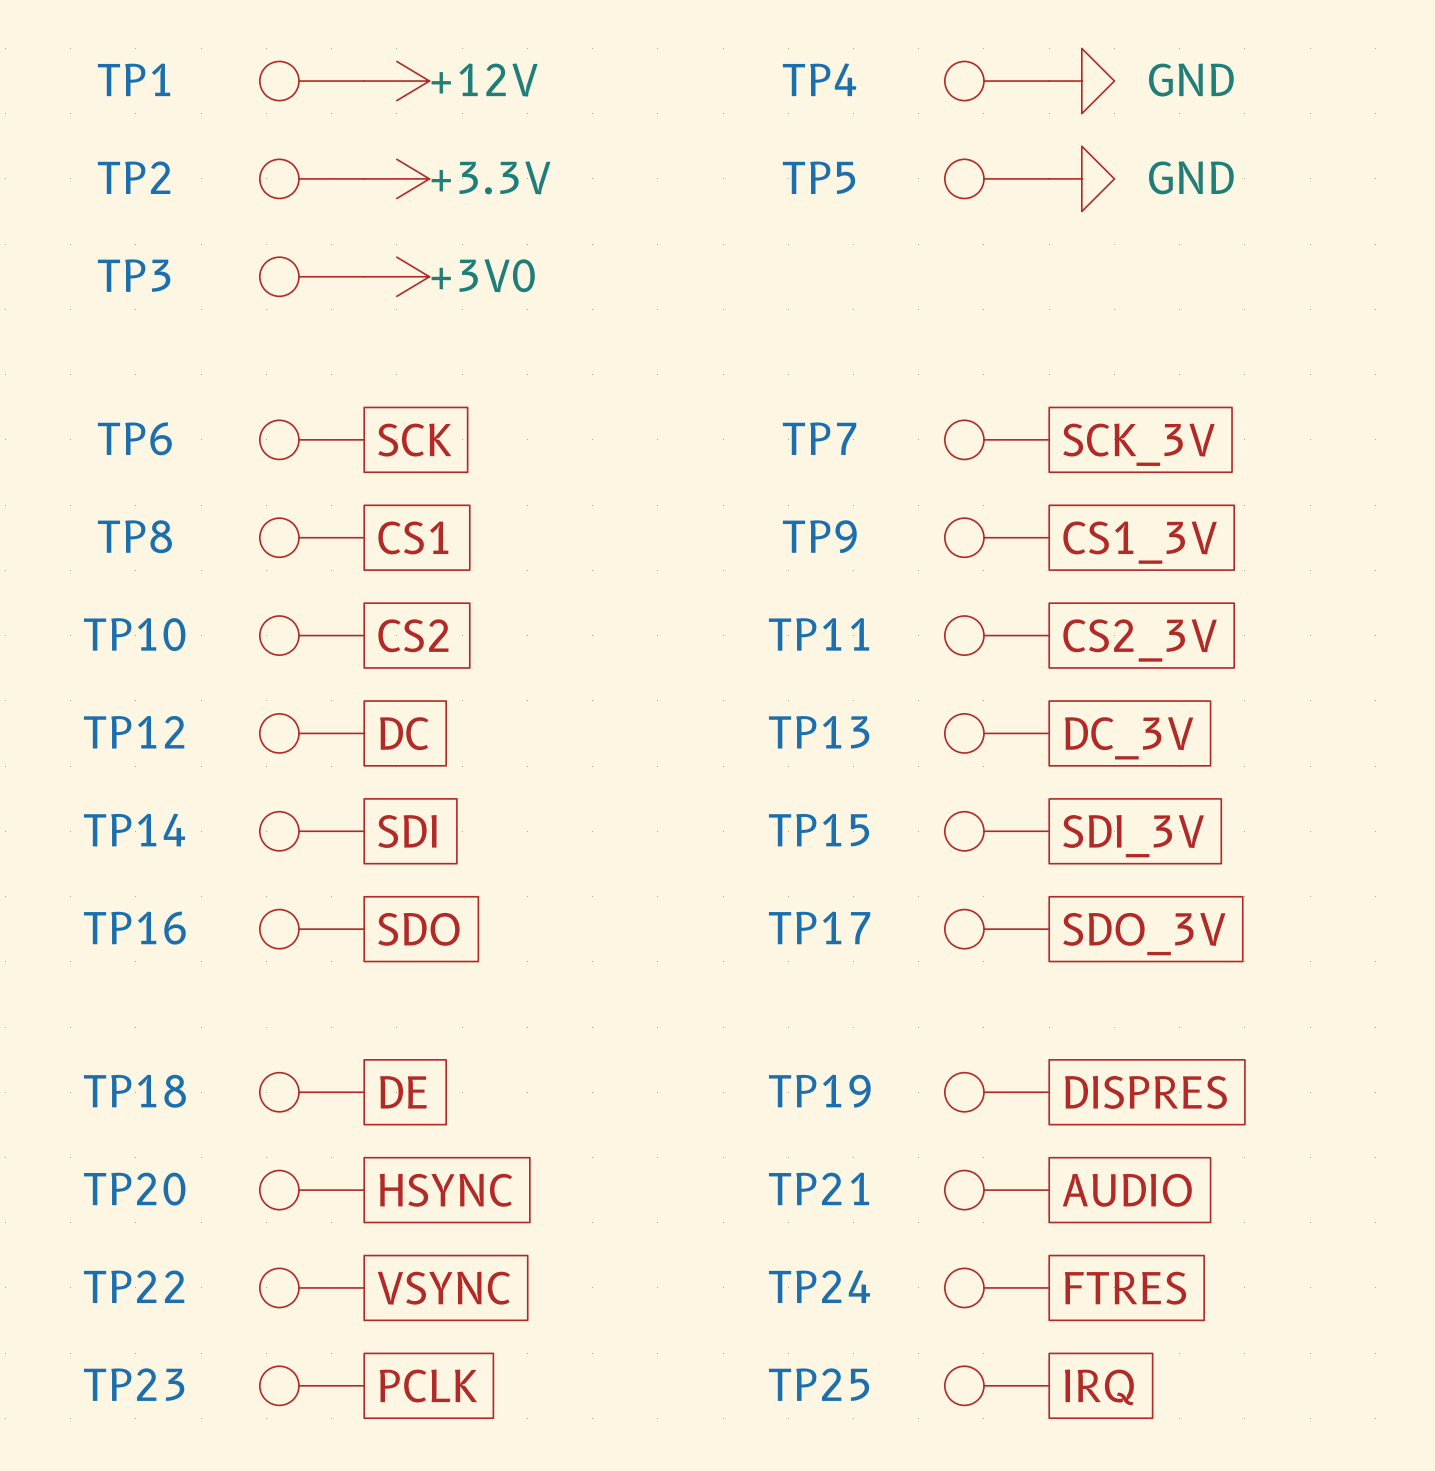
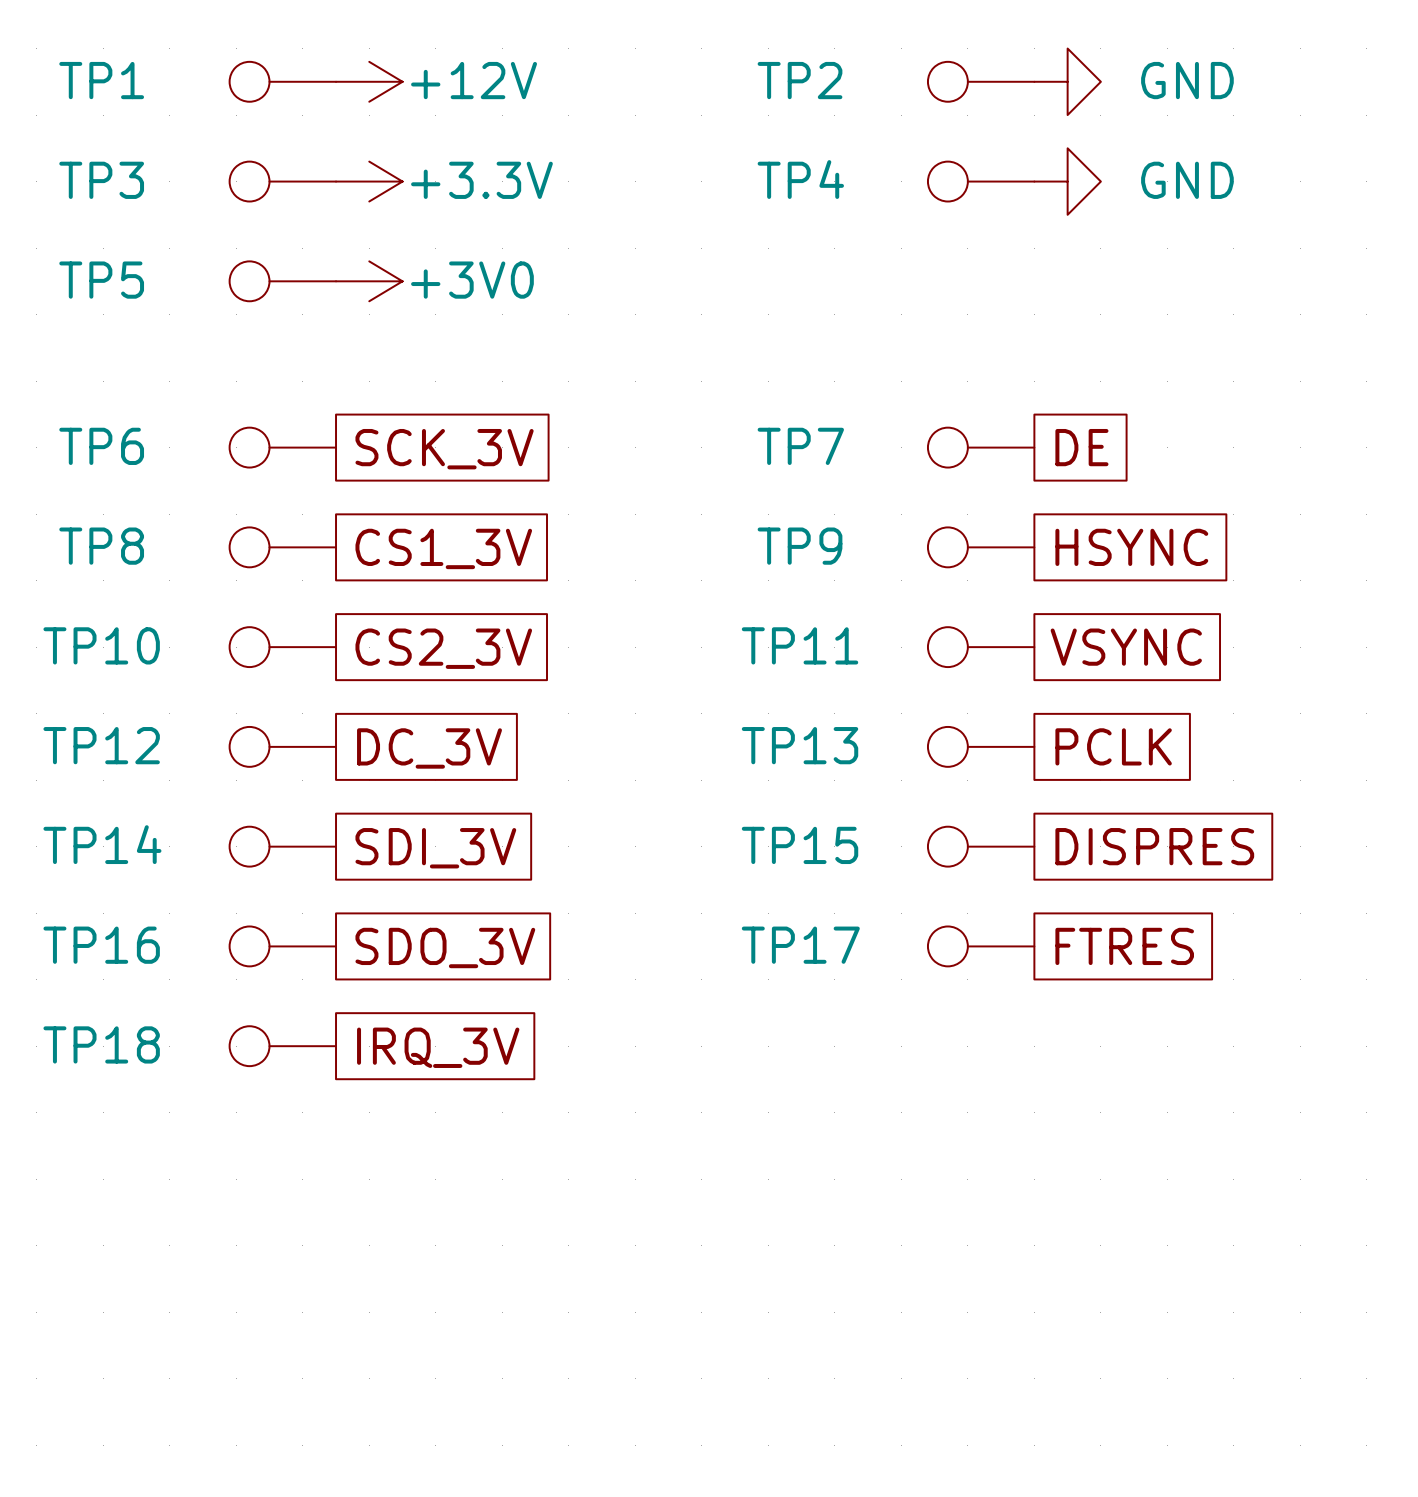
TP4 name: TP4 (819, 79) -> TP2 (800, 80)
TP2 name: TP2 (134, 177) -> TP3 (101, 180)
TP5 name: TP5 (819, 177) -> TP4 (800, 179)
TP3 name: TP3 (134, 275) -> TP5 (101, 280)
global label: SCK (414, 440) -> SCK_3V (444, 449)
global label: SCK_3V (1138, 444) -> DE (1081, 447)
global label: CS1 (413, 537) -> CS1_3V (443, 548)
global label: CS1_3V (1140, 542) -> HSYNC (1131, 547)
global label: CS2 (413, 635) -> CS2_3V (443, 648)
global label: CS2_3V (1140, 640) -> VSYNC (1126, 647)
global label: DC (404, 733) -> DC_3V (429, 748)
global label: DC_3V (1129, 738) -> PCLK (1113, 746)
global label: SDI (407, 831) -> SDI_3V (435, 848)
global label: SDI_3V (1133, 836) -> DISPRES (1154, 846)
global label: SDO (418, 929) -> SDO_3V (445, 948)
global label: SDO_3V (1144, 934) -> FTRES (1124, 946)
global label: none -> IRQ_3V (438, 1047)
TP18 position: (312, 1092) -> (282, 1046)
global label: DE (403, 1092) -> none
TP19: (997, 1092) -> none
global label: DISPRES (1145, 1092) -> none
TP20: (312, 1190) -> none
global label: HSYNC (445, 1190) -> none
TP21: (997, 1190) -> none
global label: AUDIO (1127, 1190) -> none
TP22: (312, 1287) -> none
TP24: (997, 1287) -> none
global label: VSYNC (443, 1288) -> none
global label: FTRES (1125, 1288) -> none
TP23: (312, 1385) -> none
global label: PCLK (428, 1385) -> none
TP25: (997, 1385) -> none
global label: IRQ (1099, 1387) -> none

